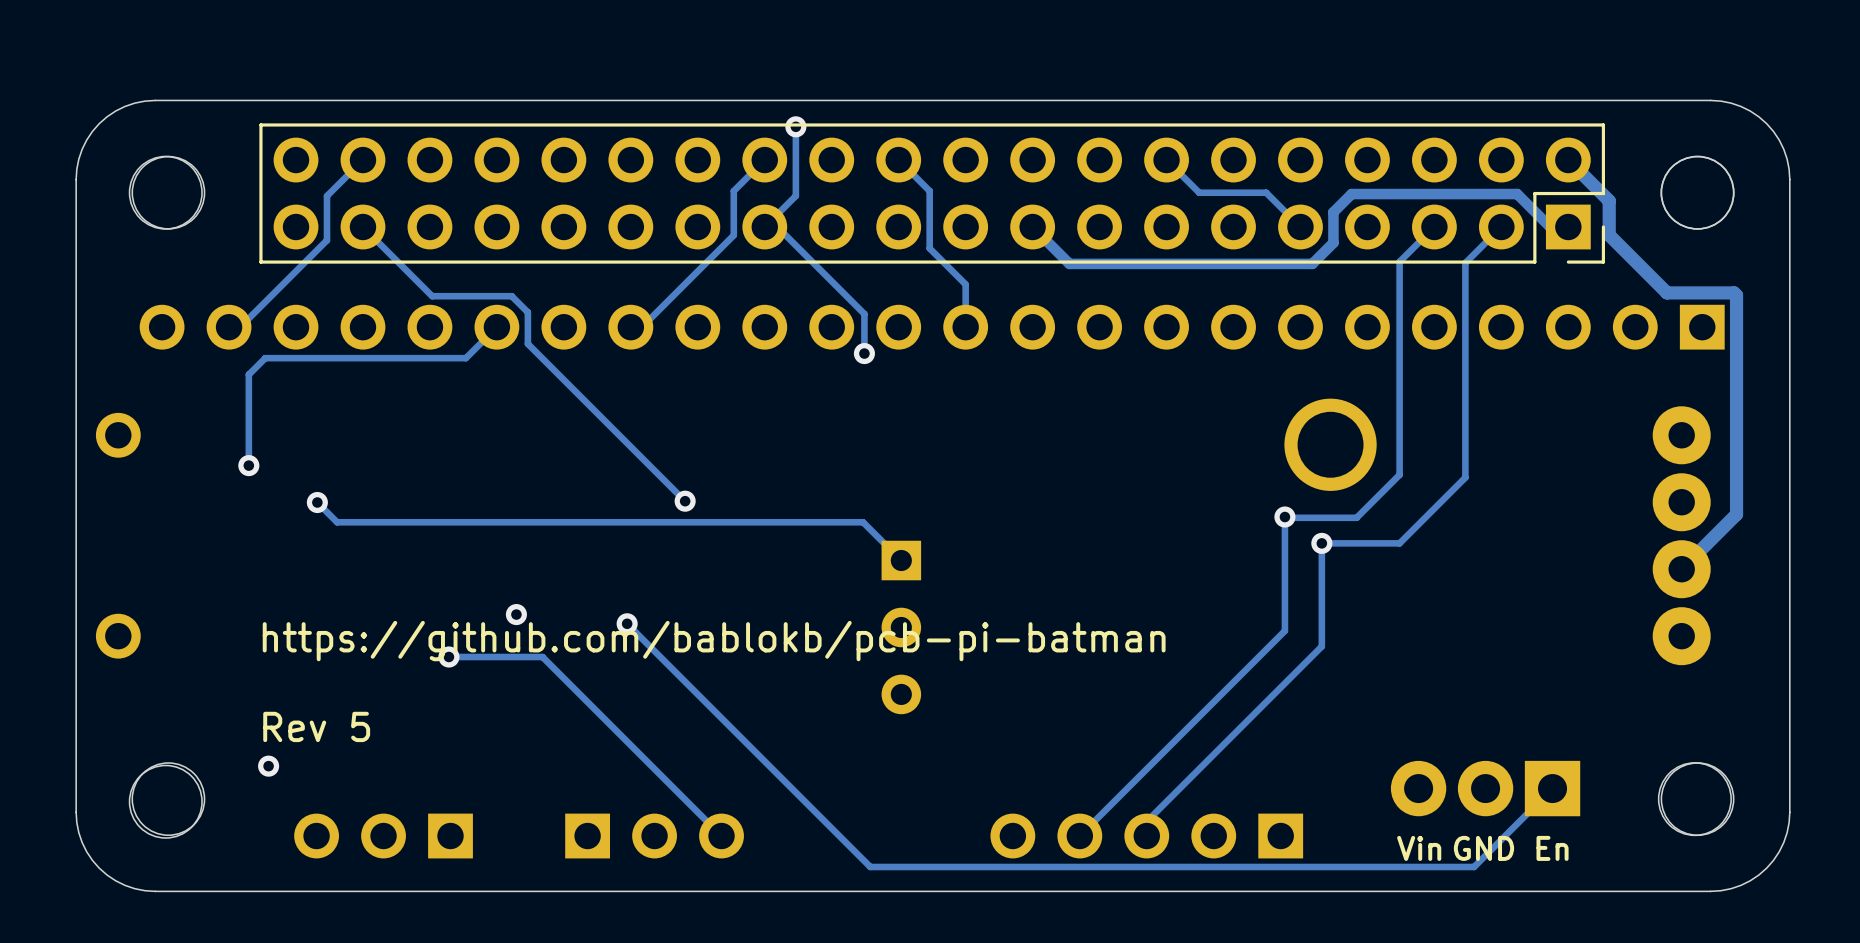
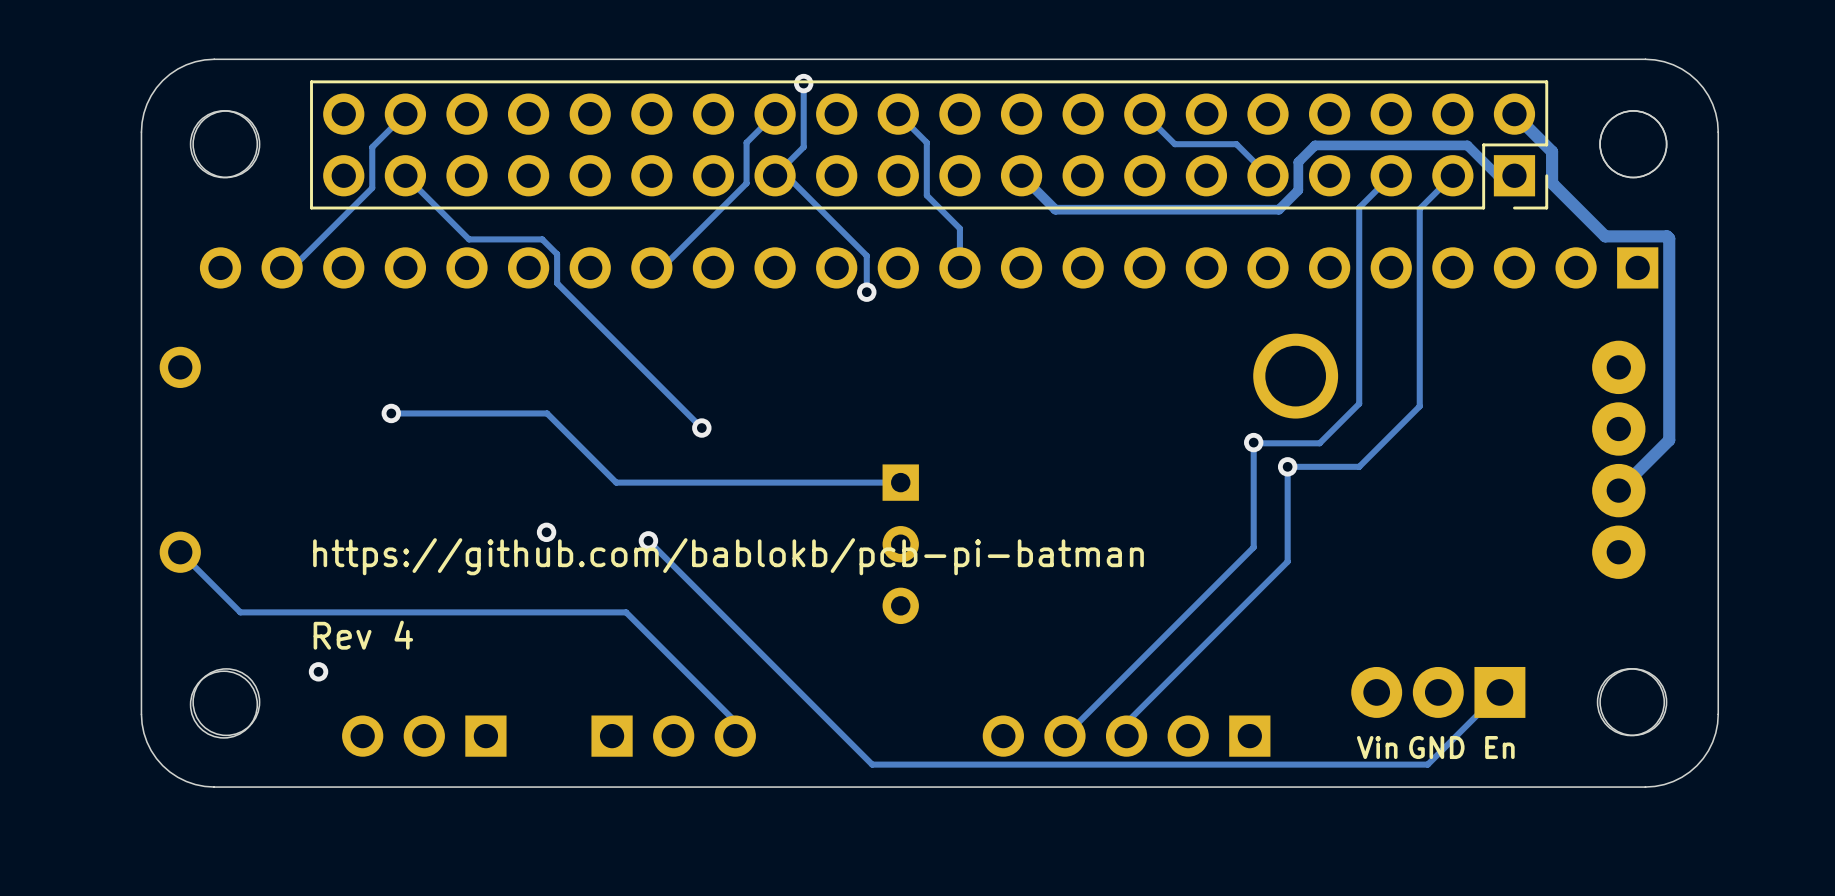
track: (496, 327) (465, 358) (265, 358) (248, 374) (248, 465) -> none
via: (248, 465) -> none
track: (317, 502) (337, 522) (863, 522) (901, 560) -> (391, 413) (547, 413) (616, 482) (900, 482)
via position: (317, 502) -> (391, 413)
track: none -> (180, 552) (240, 612) (626, 612) (735, 721)
track: (448, 657) (542, 657) (721, 836) -> none
via: (448, 657) -> none
text: Rev 5 (316, 726) -> Rev 4 (363, 635)

